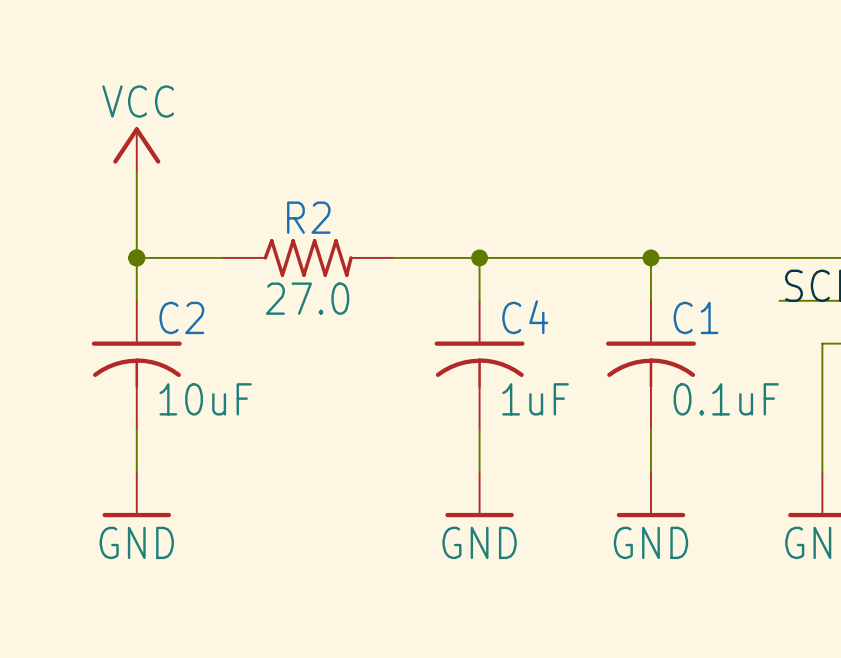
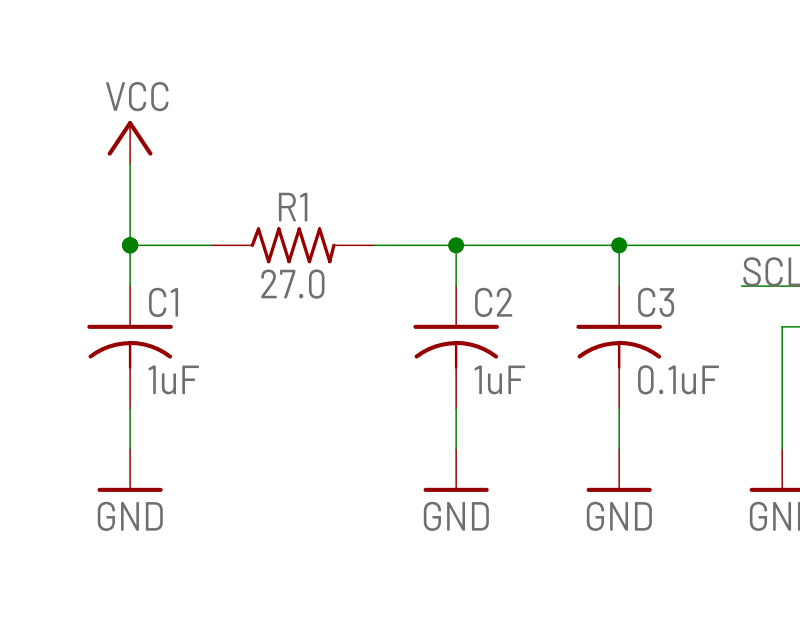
R2 name: R2 (308, 217) -> R1 (293, 207)
C2 name: C2 (181, 317) -> C1 (163, 302)
C4 name: C4 (525, 317) -> C2 (493, 302)
C1 name: C1 (696, 317) -> C3 (656, 302)
C2 value: 10uF (205, 399) -> 1uF (173, 379)

